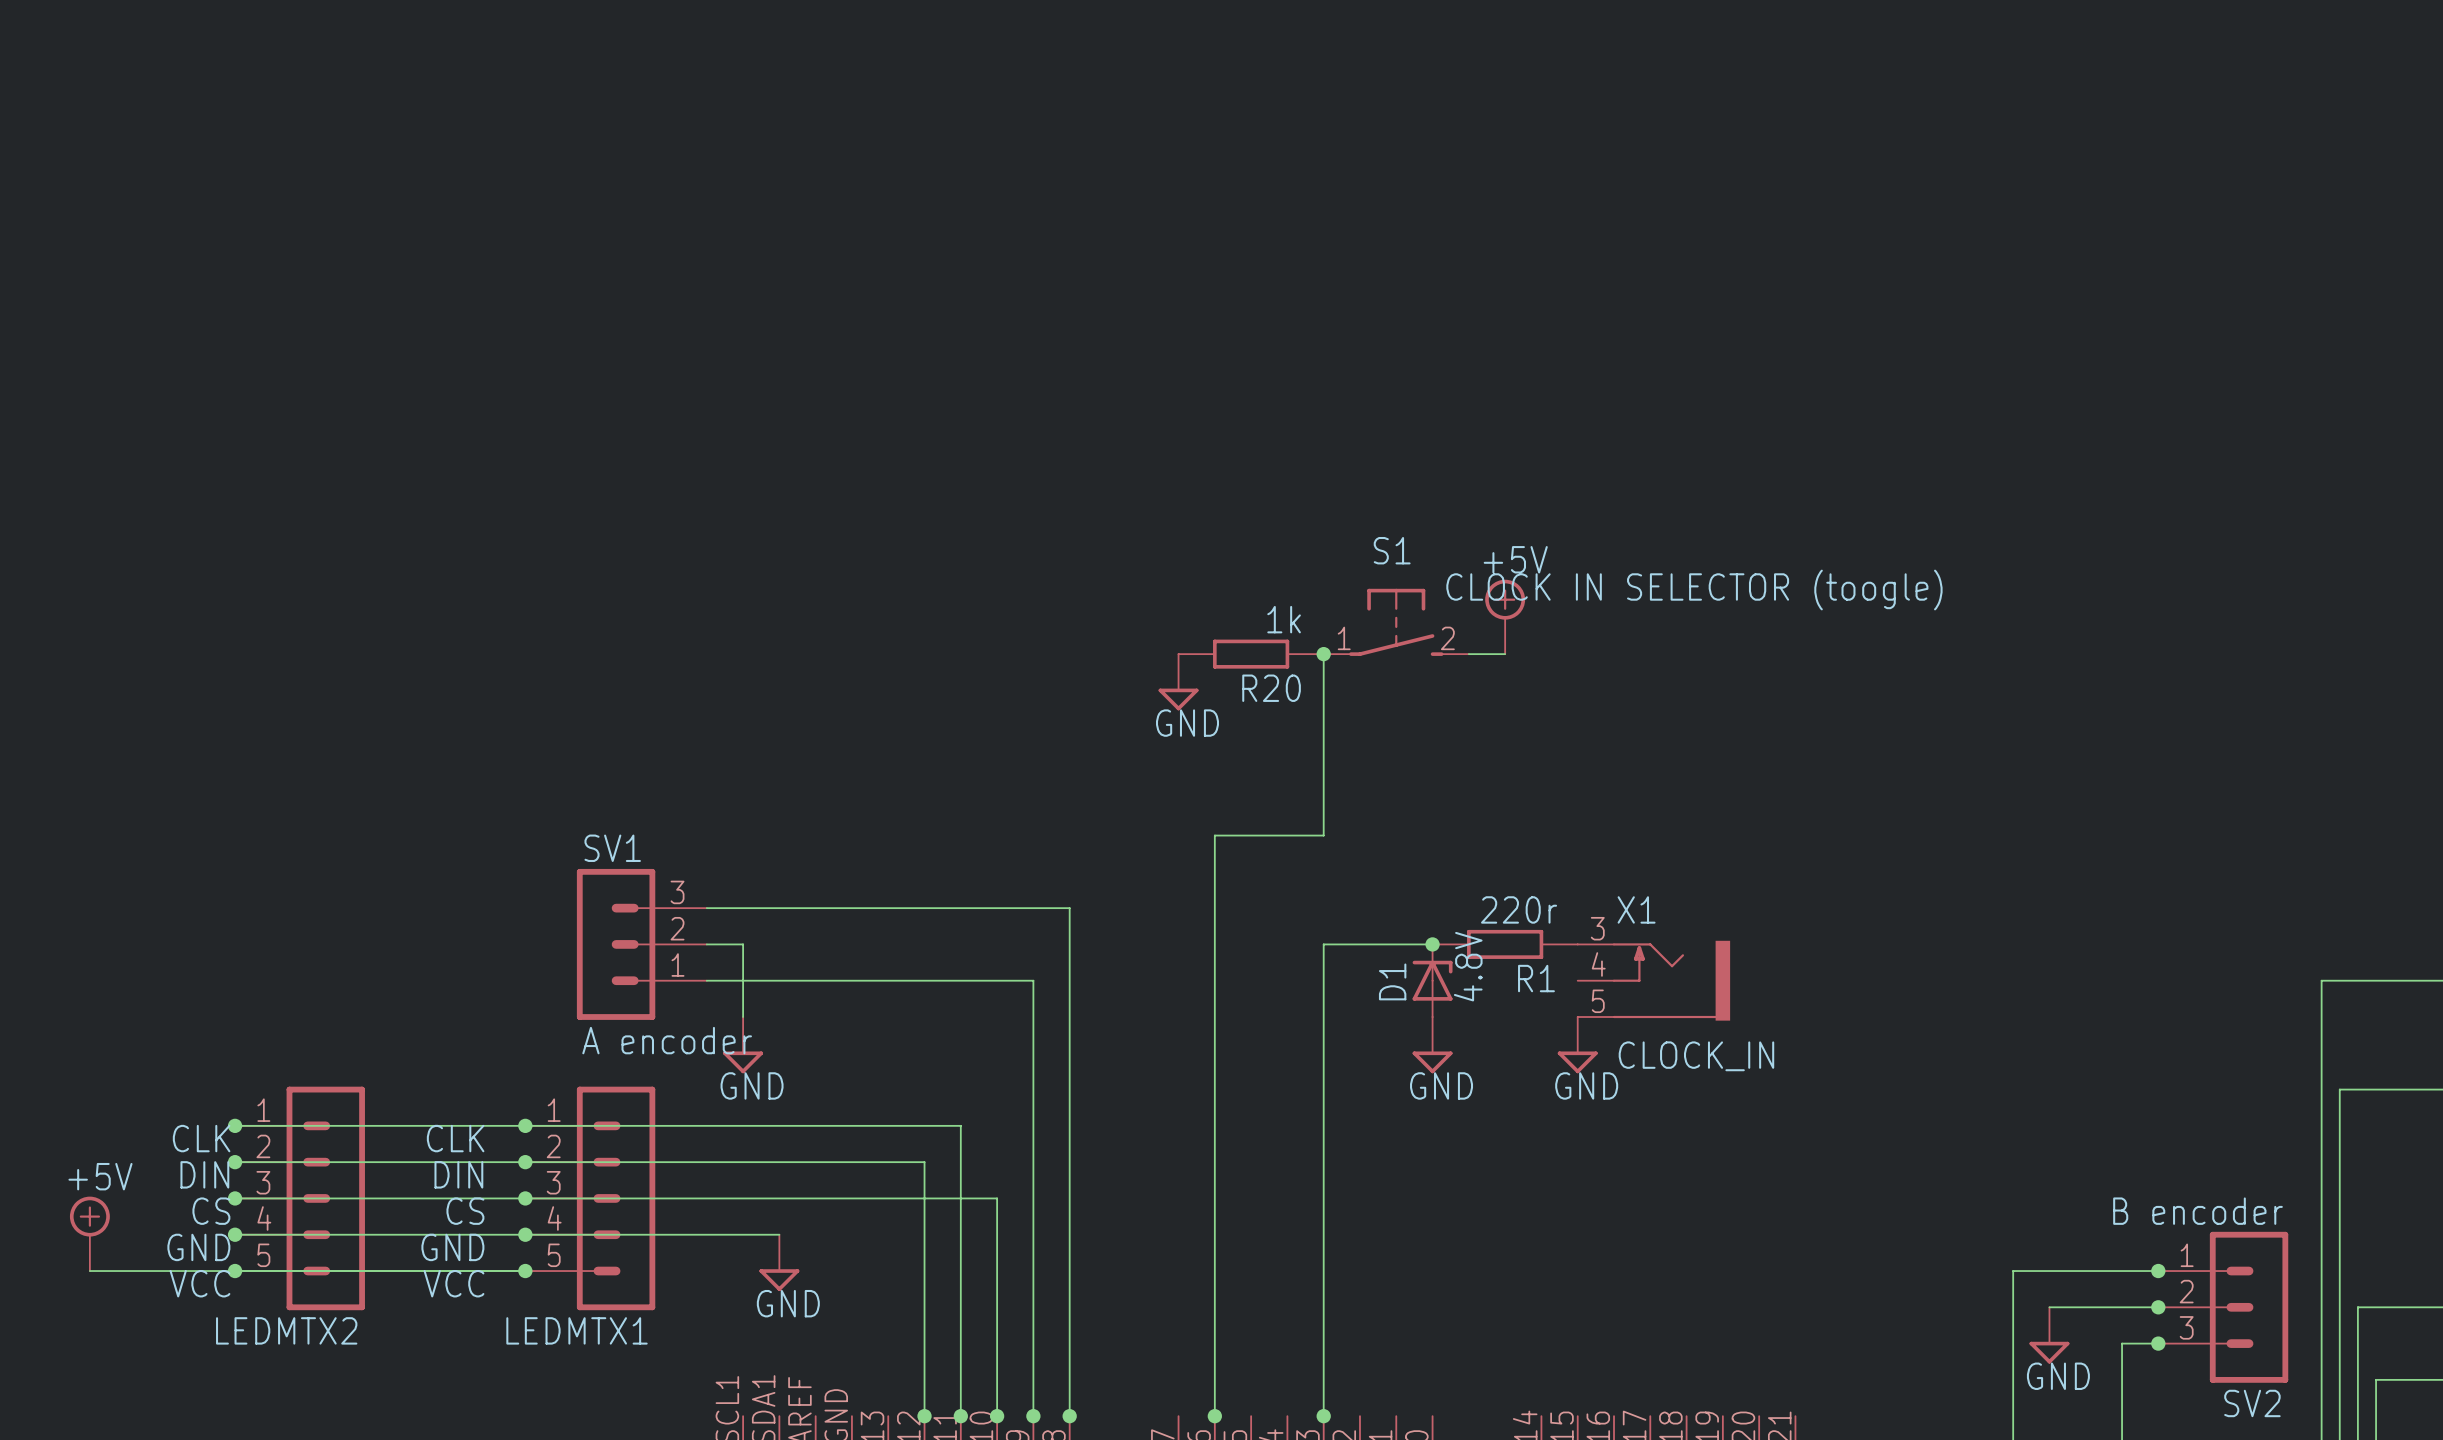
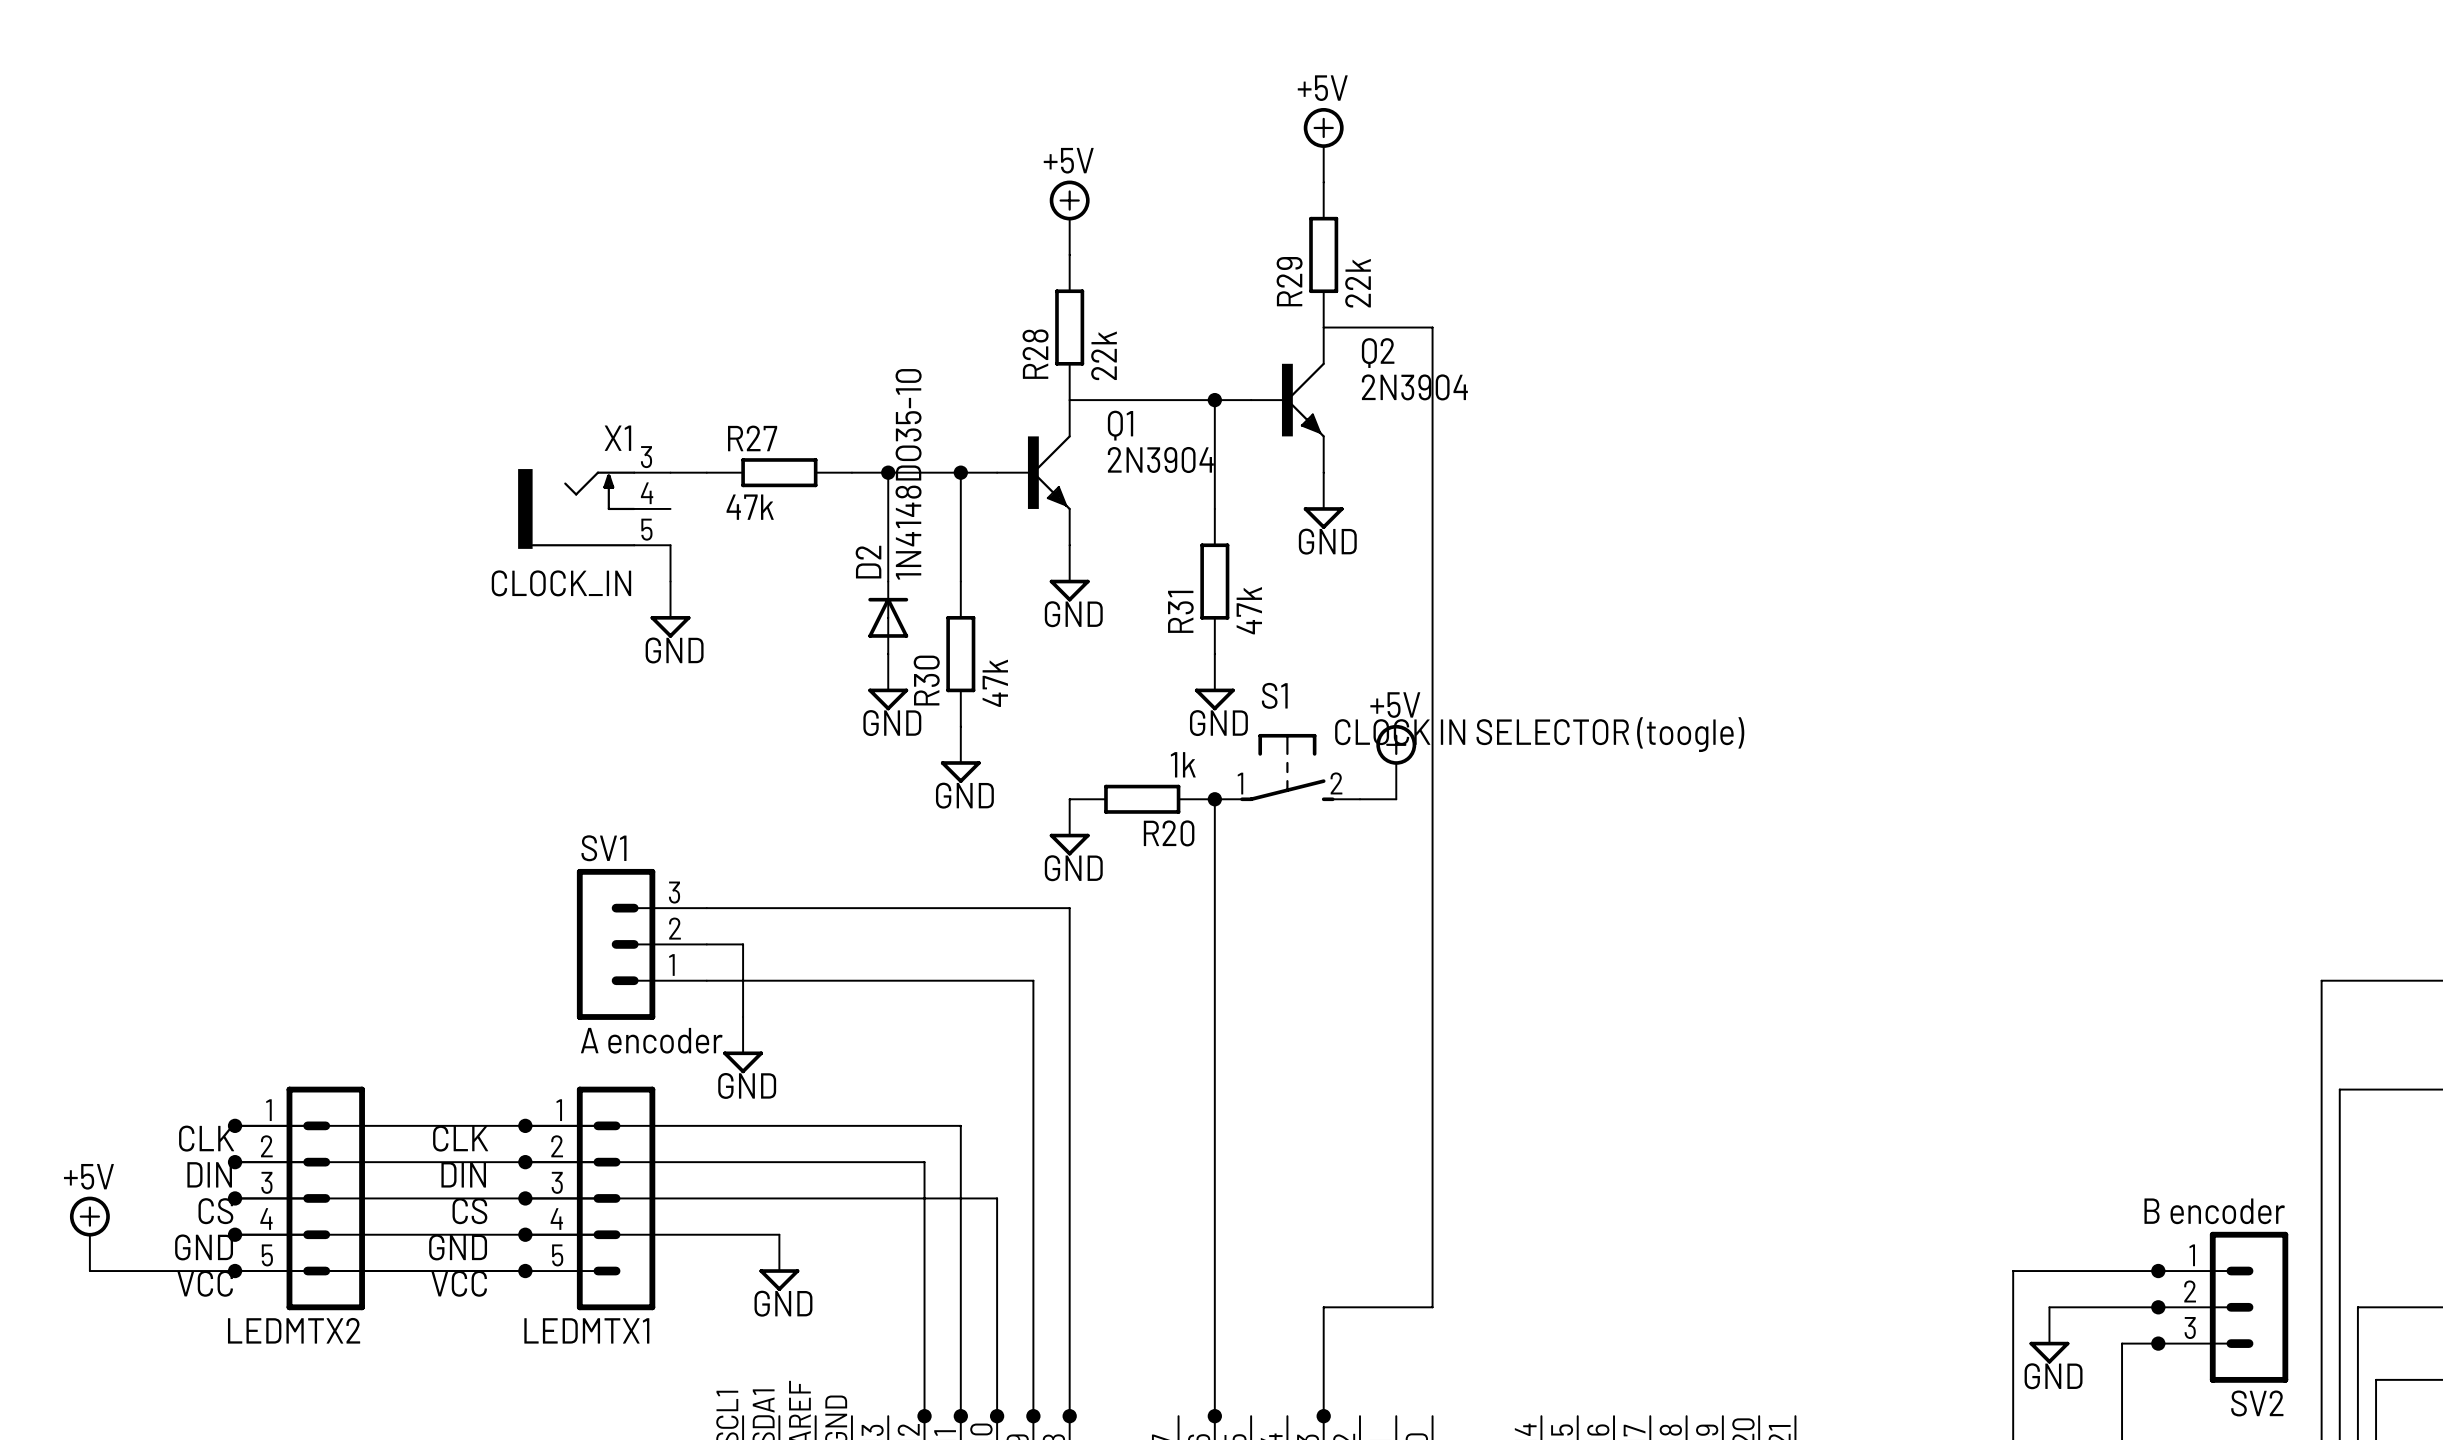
power symbol: none -> +5V (1323, 145)
power symbol: none -> +5V (1069, 217)
R29: none -> 22k (1323, 254)
R28: none -> 22k (1069, 327)
wire: none -> (1069, 400) (1251, 400)
wire: none -> (1214, 400) (1214, 508)
junction: none -> (1214, 400)
Q2: none -> 2N3904 (1287, 400)
wire: none -> (670, 472) (706, 472)
R27: none -> 47k (779, 472)
wire: none -> (851, 472) (997, 472)
wire: none -> (888, 472) (888, 581)
junction: none -> (888, 472)
wire: none -> (960, 472) (960, 581)
junction: none -> (960, 472)
Q1: none -> 2N3904 (1033, 472)
power symbol: none -> GND (1323, 500)
wire: none -> (670, 545) (670, 581)
power symbol: none -> GND (1069, 573)
R31: none -> 47k (1214, 581)
power symbol: none -> GND (670, 609)
power symbol position: +5V (1505, 616) -> +5V (1396, 762)
D2: none -> 1N4148DO35-10 (888, 617)
S1 position: (1396, 622) -> (1287, 767)
R30: none -> 47k (960, 654)
R20 position: (1251, 654) -> (1142, 799)
wire: (1323, 654) (1323, 835) (1214, 835) -> (1214, 799) (1214, 835)
junction: (1323, 654) -> none
wire: (1468, 654) (1505, 654) -> (1359, 799) (1396, 799)
power symbol: none -> GND (888, 682)
power symbol position: GND (1178, 682) -> GND (1214, 682)
power symbol: none -> GND (960, 754)
junction: none -> (1214, 799)
power symbol: none -> GND (1069, 827)
wire: (1432, 944) (1323, 944) (1323, 1307) -> (1323, 327) (1432, 327) (1432, 1307) (1323, 1307)
junction: (1432, 944) -> none
R1: 220r (1505, 944) -> none
D1: 4.8V (1432, 980) -> none
X1 position: (1653, 980) -> (594, 508)
X1 flip: as is (1671, 980) -> left-right (576, 508)
power symbol: GND (1432, 1045) -> none
power symbol: GND (1577, 1045) -> none

